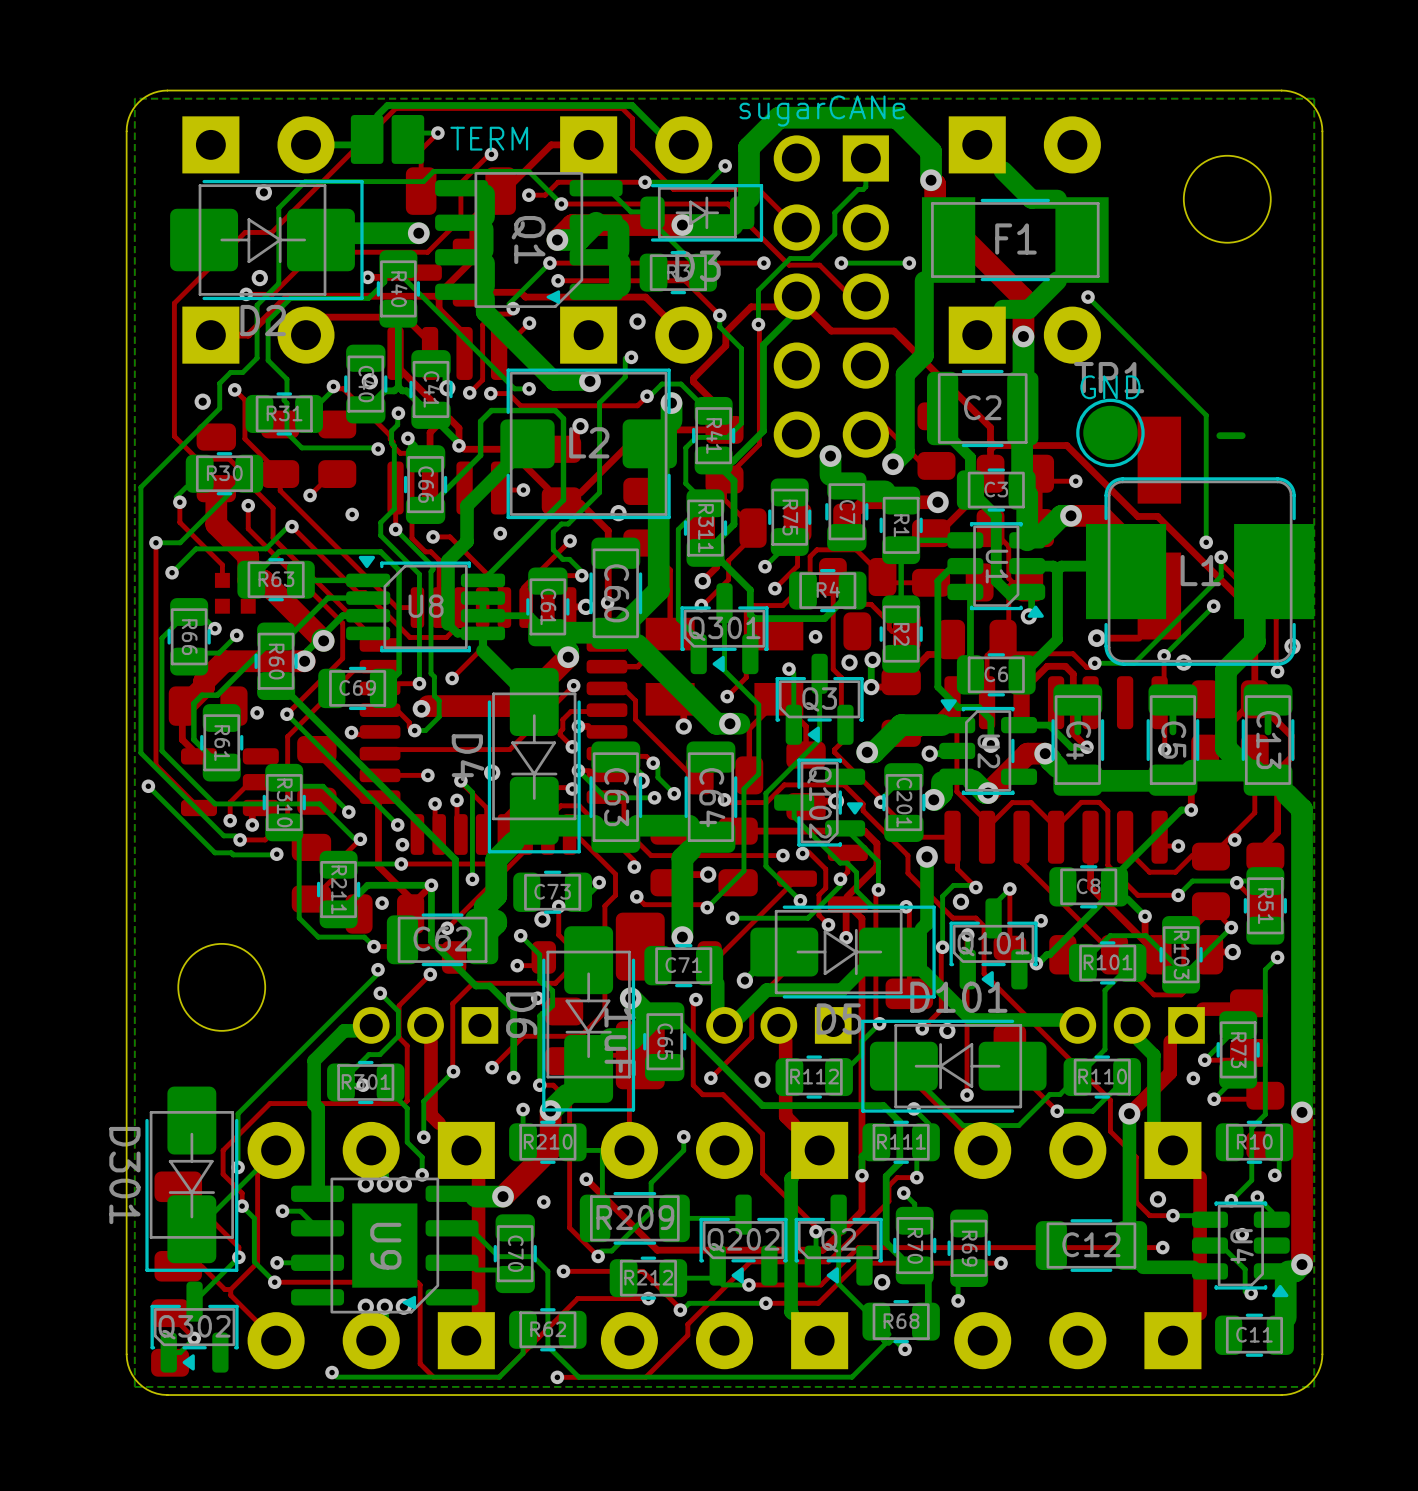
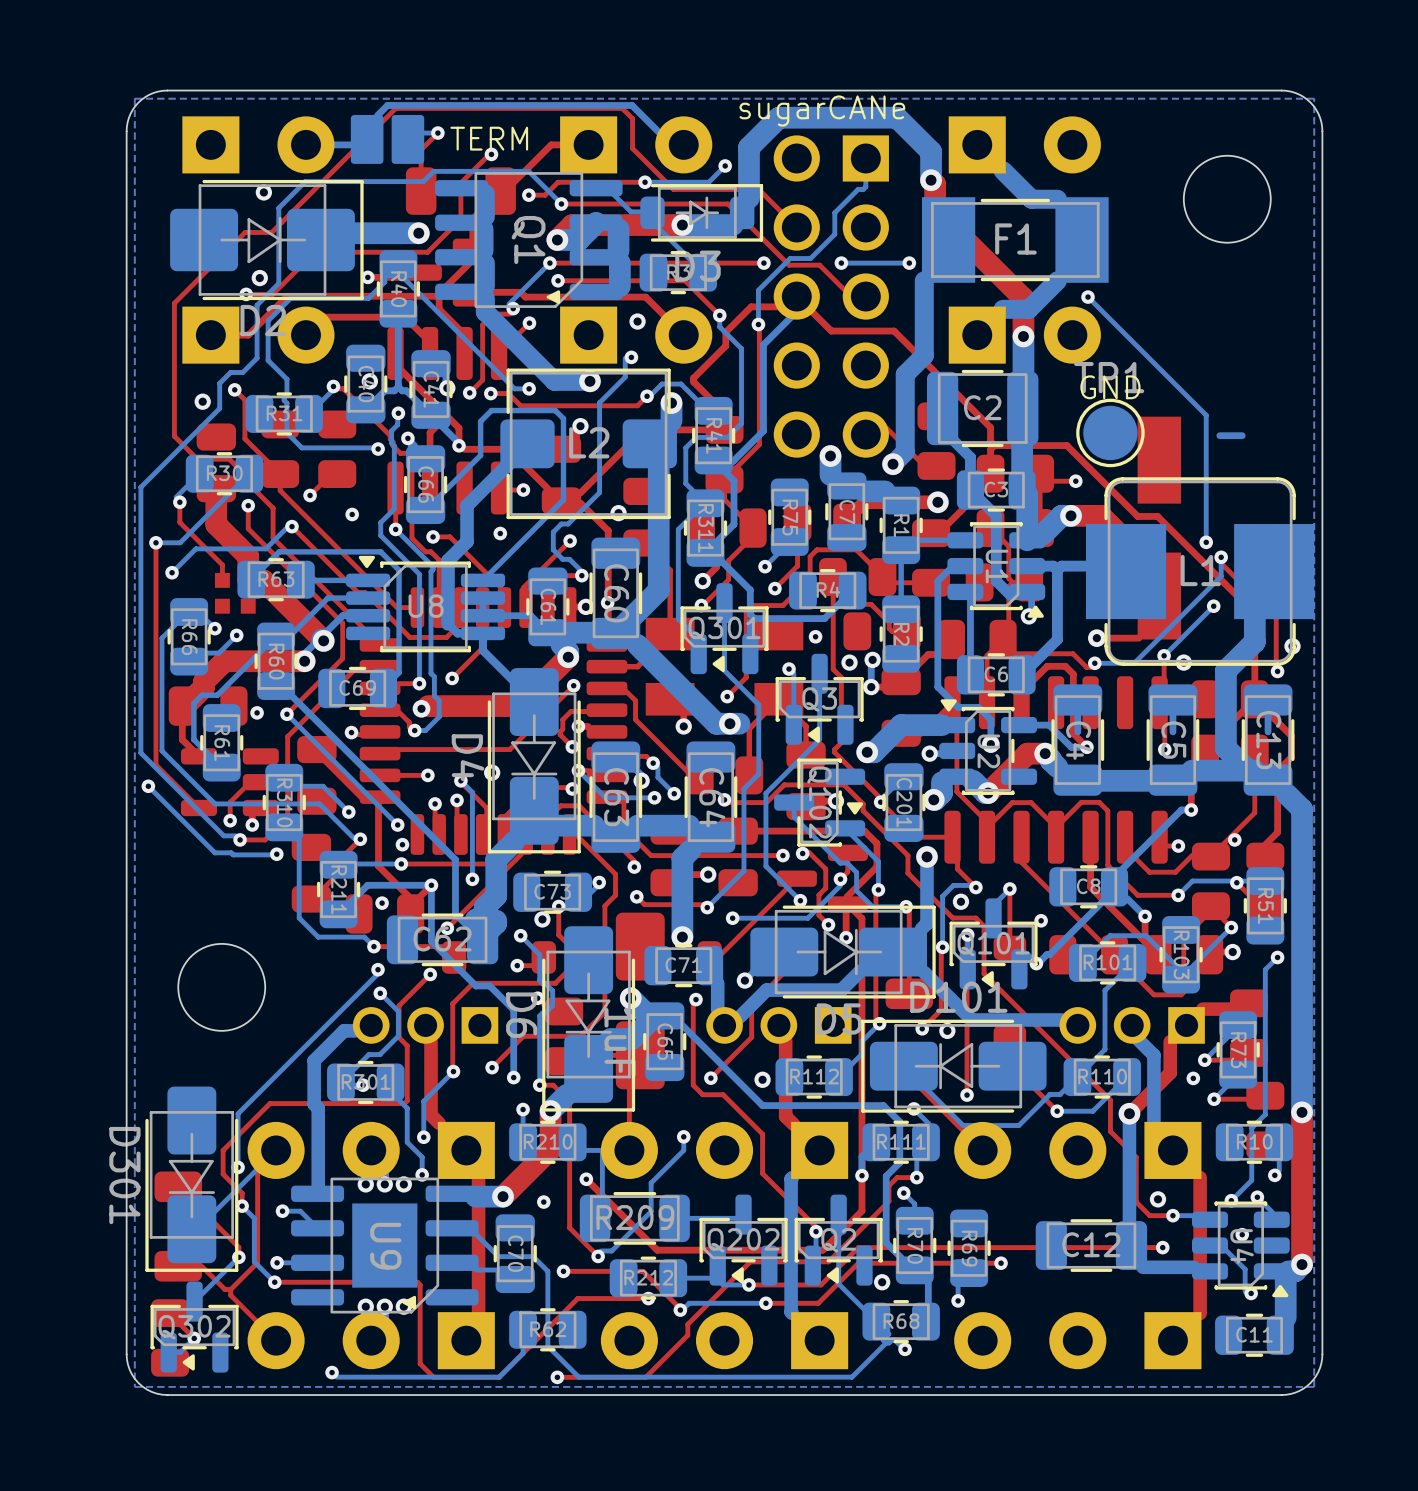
bottom track width: thick (482, 650) (534, 702) -> thin (482, 650) (534, 702)

